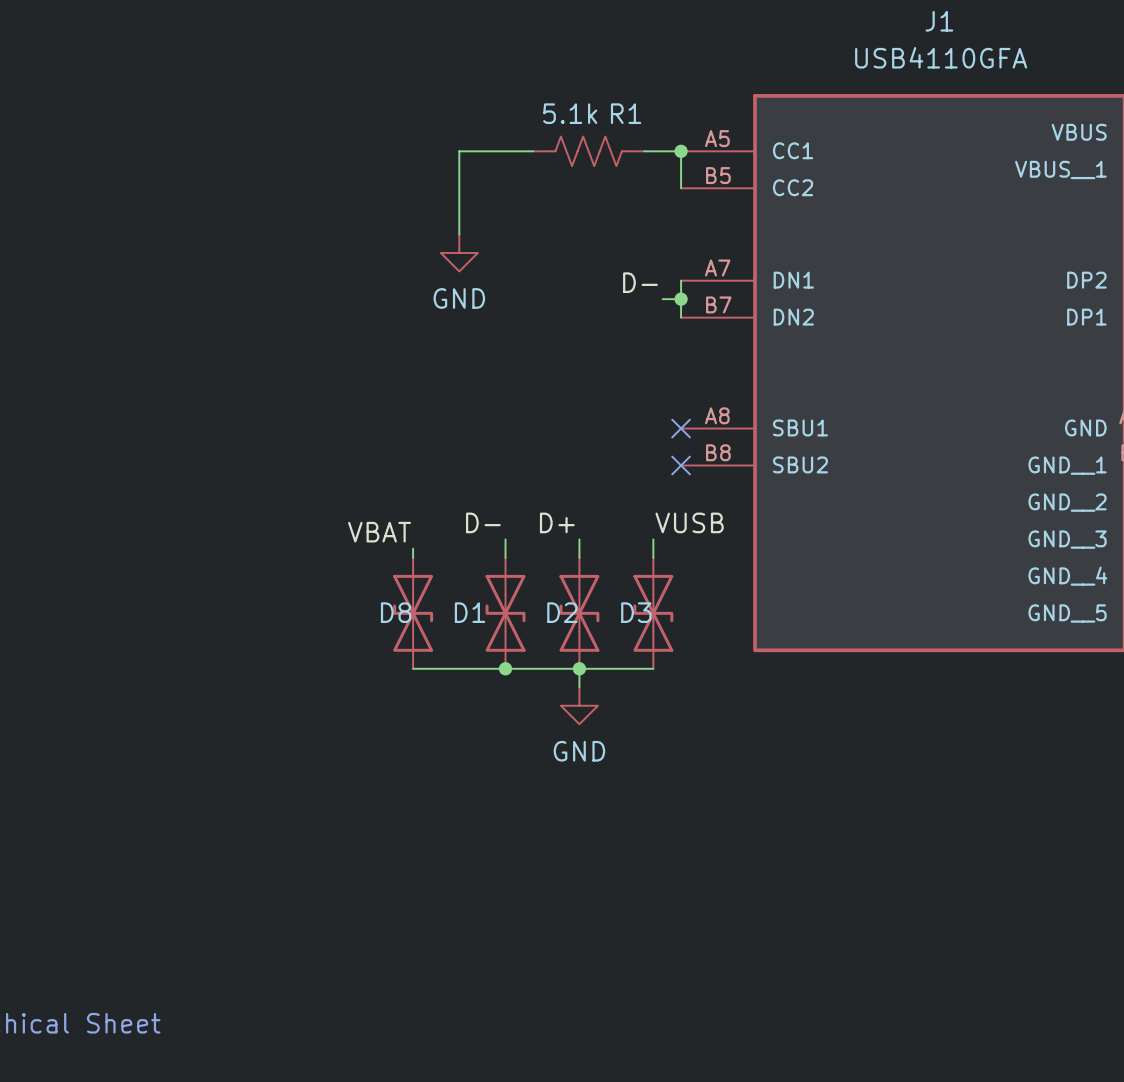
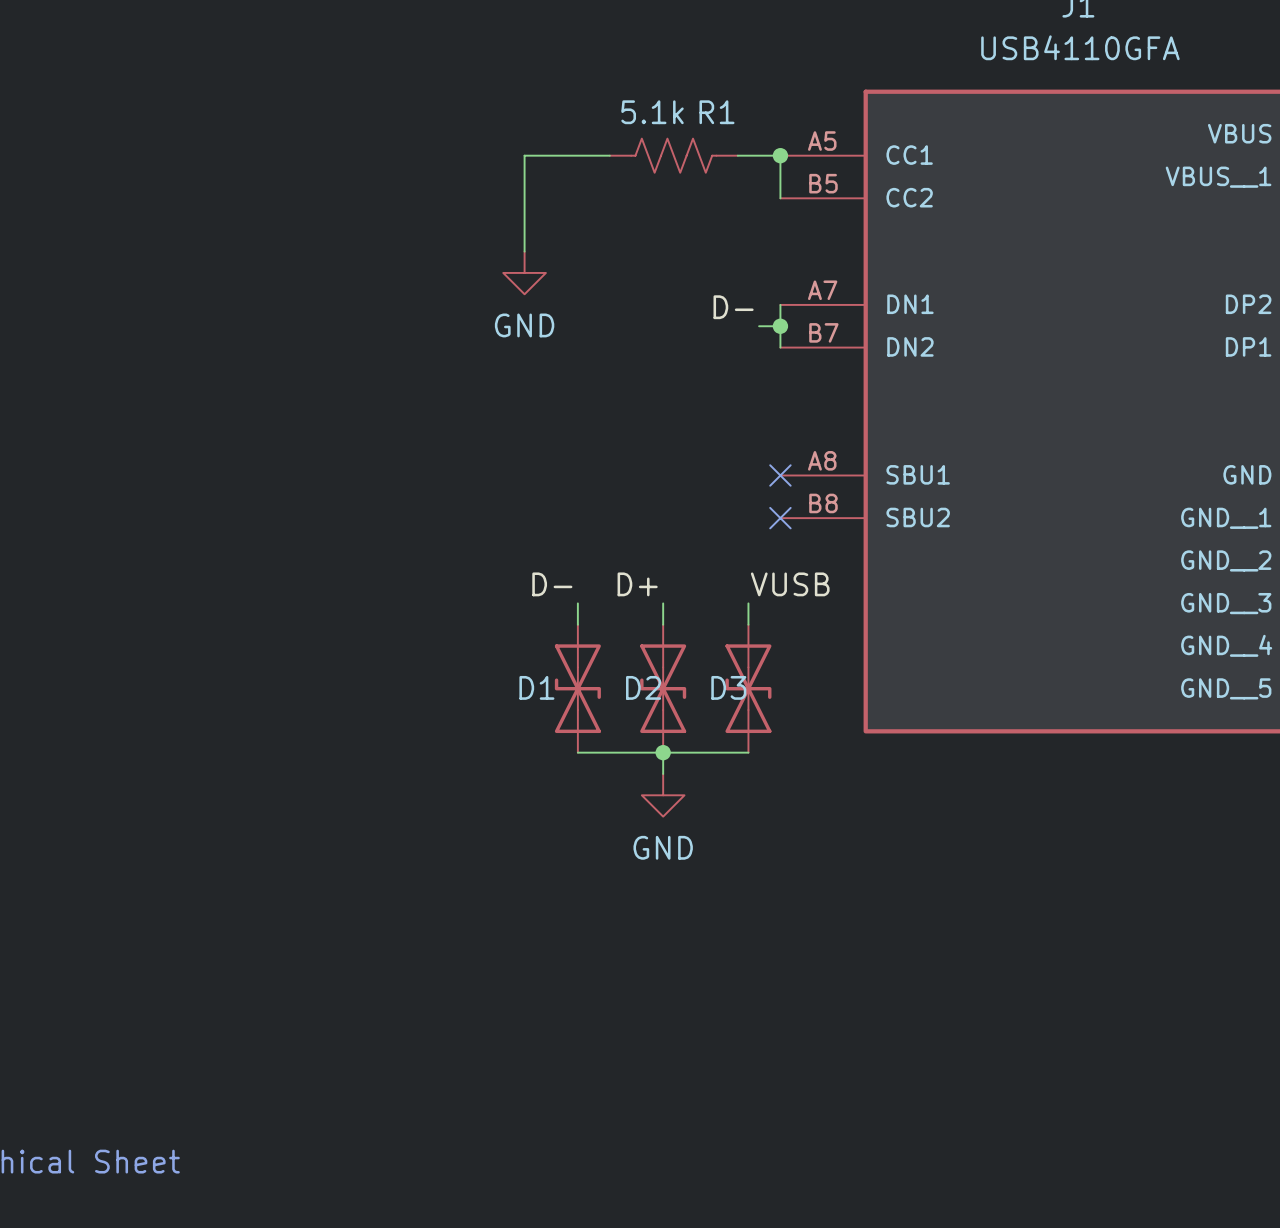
label: VBAT (379, 532) -> none
wire: (413, 548) (413, 557) -> none
D8: (413, 613) -> none
wire: (413, 668) (505, 668) -> none
junction: (505, 668) -> none

